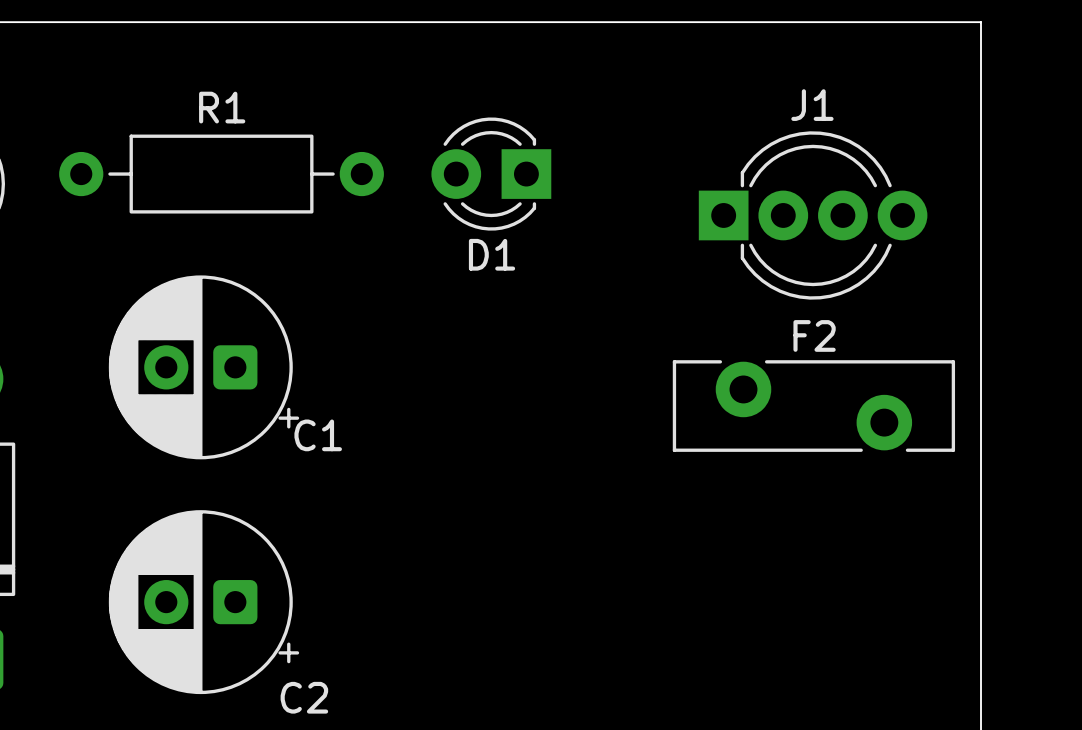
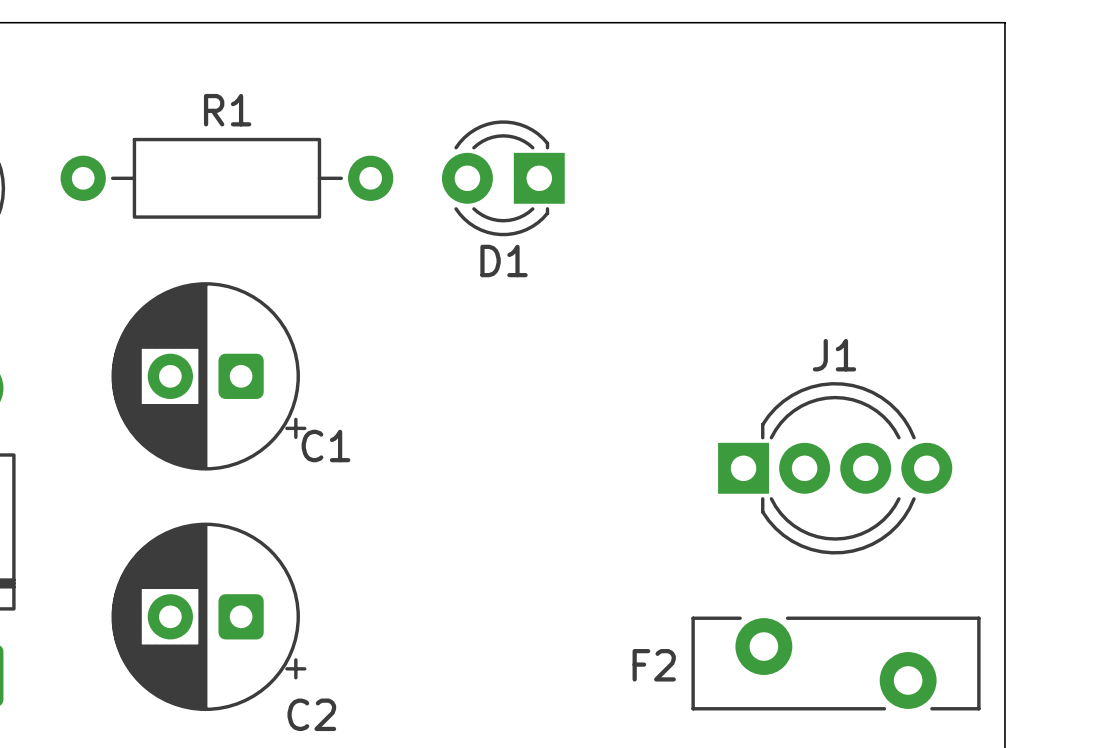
J1 position: (813, 215) -> (835, 468)
F2 name position: F2 (814, 335) -> F2 (654, 665)
F2 position: (813, 406) -> (836, 663)

